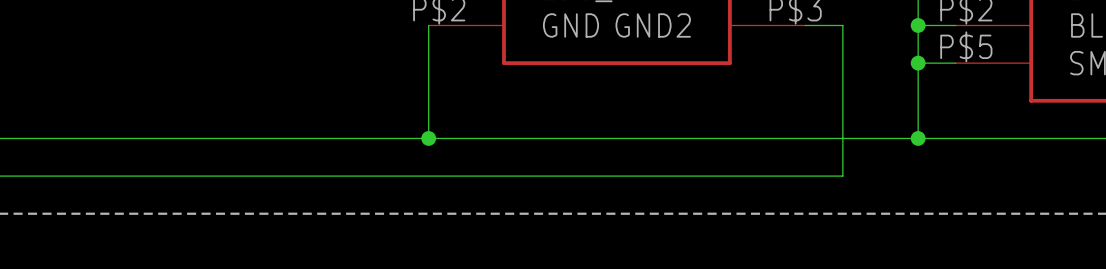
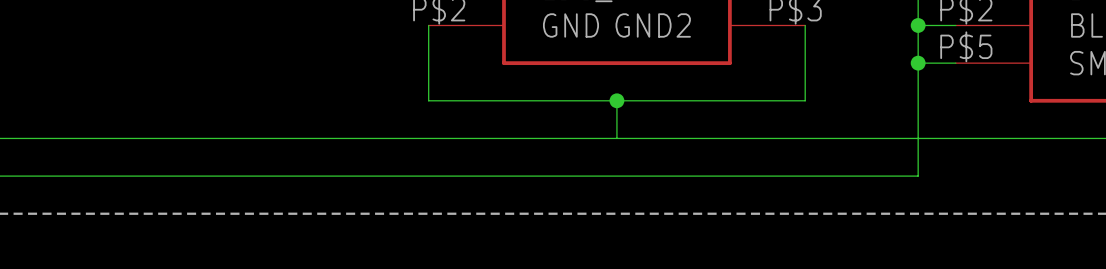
wire: (805, 25) (842, 25) (842, 176) -> (918, 138) (918, 176) (842, 176)
wire: (428, 100) (428, 138) -> (428, 100) (805, 100) (805, 25)
wire: none -> (616, 100) (616, 138)
junction: none -> (616, 100)
junction: (428, 138) -> none
junction: (918, 138) -> none

